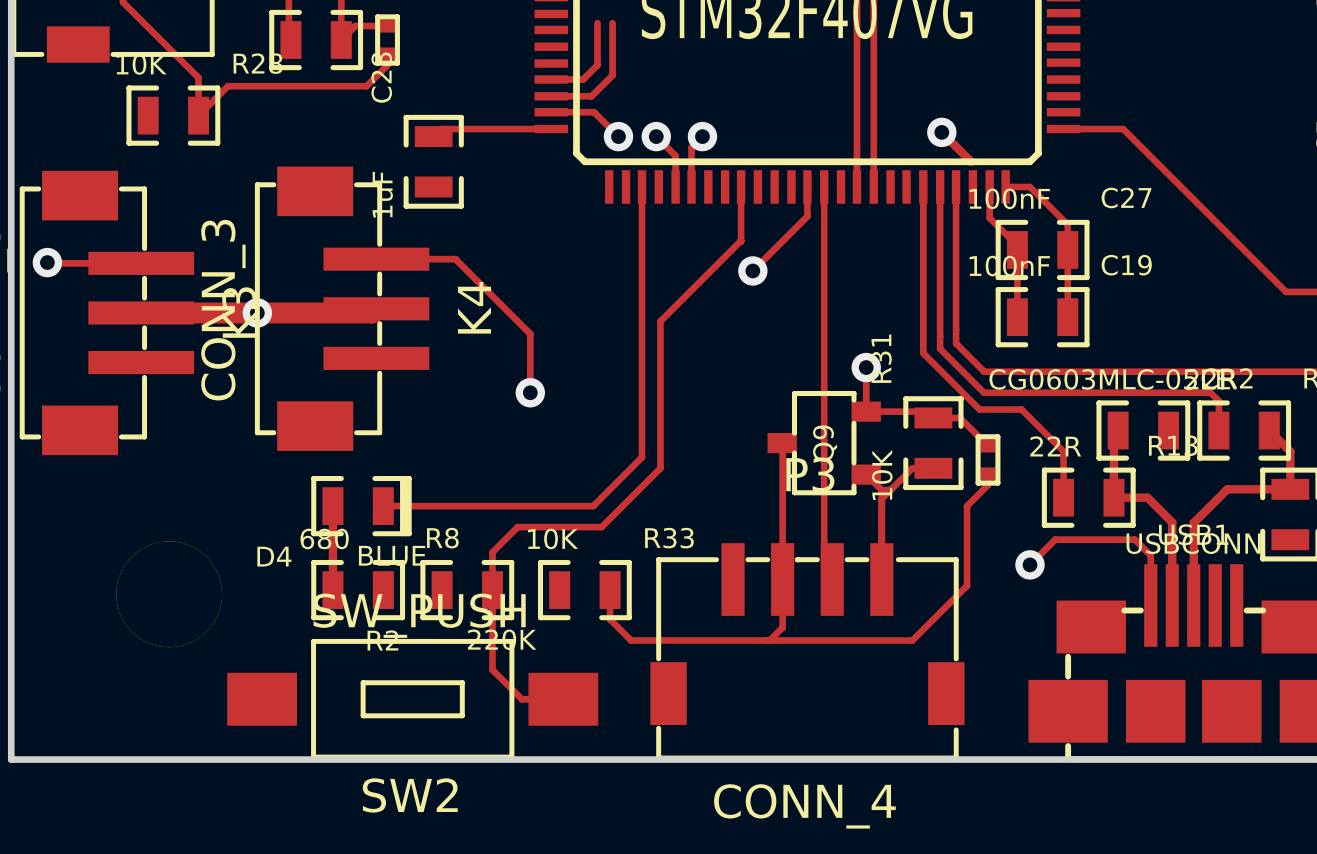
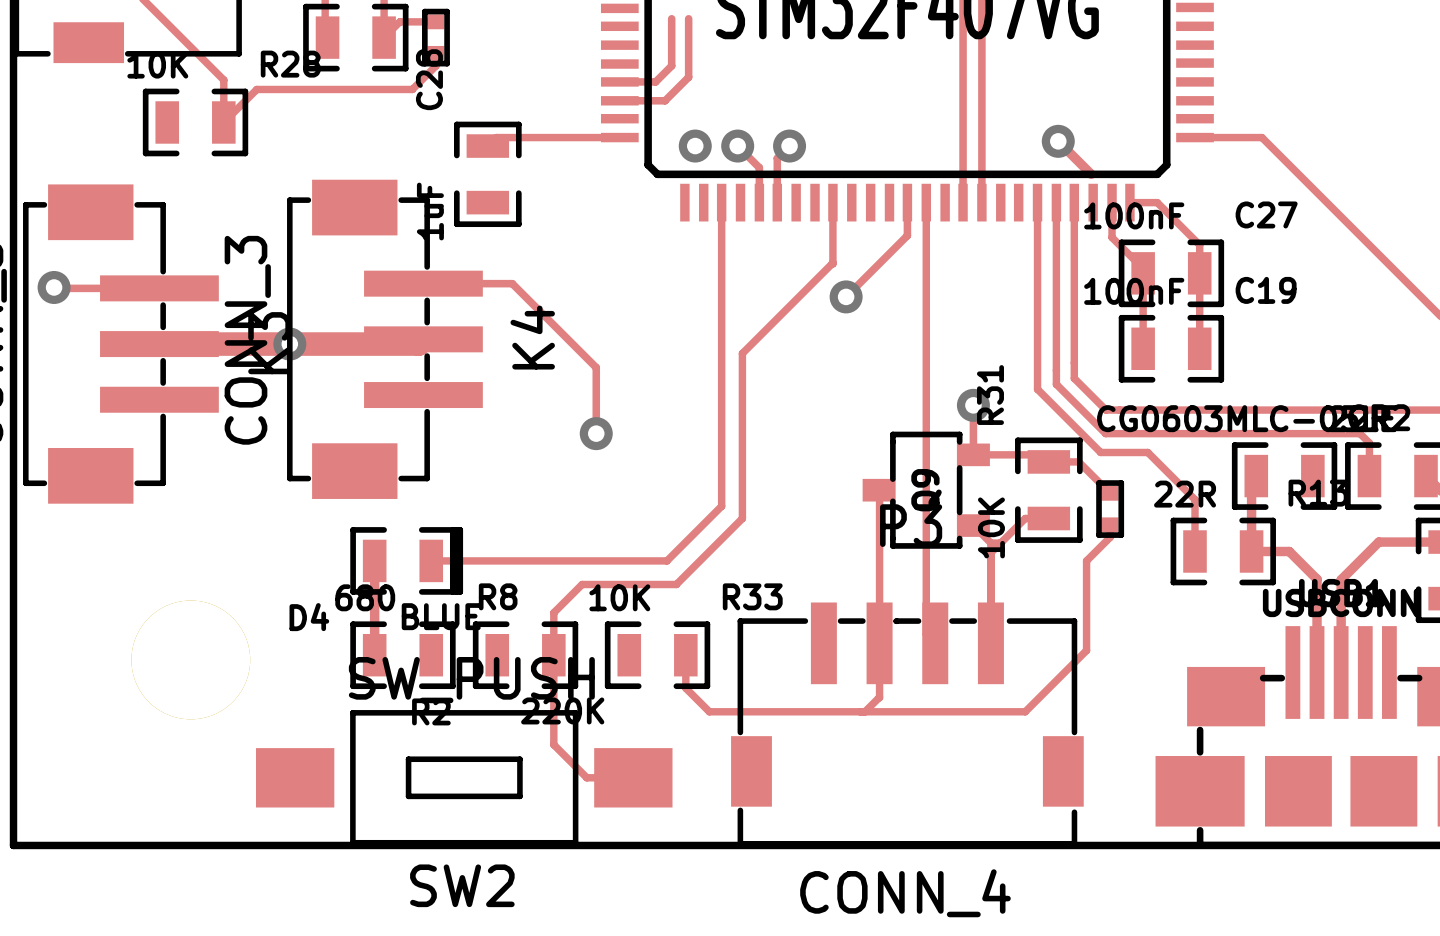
track: (551, 112) (594, 112) (618, 136) -> none
track: (1029, 564) (1055, 539) (1134, 539) (1150, 555) (1150, 605) -> none
via: (1029, 564) -> none

